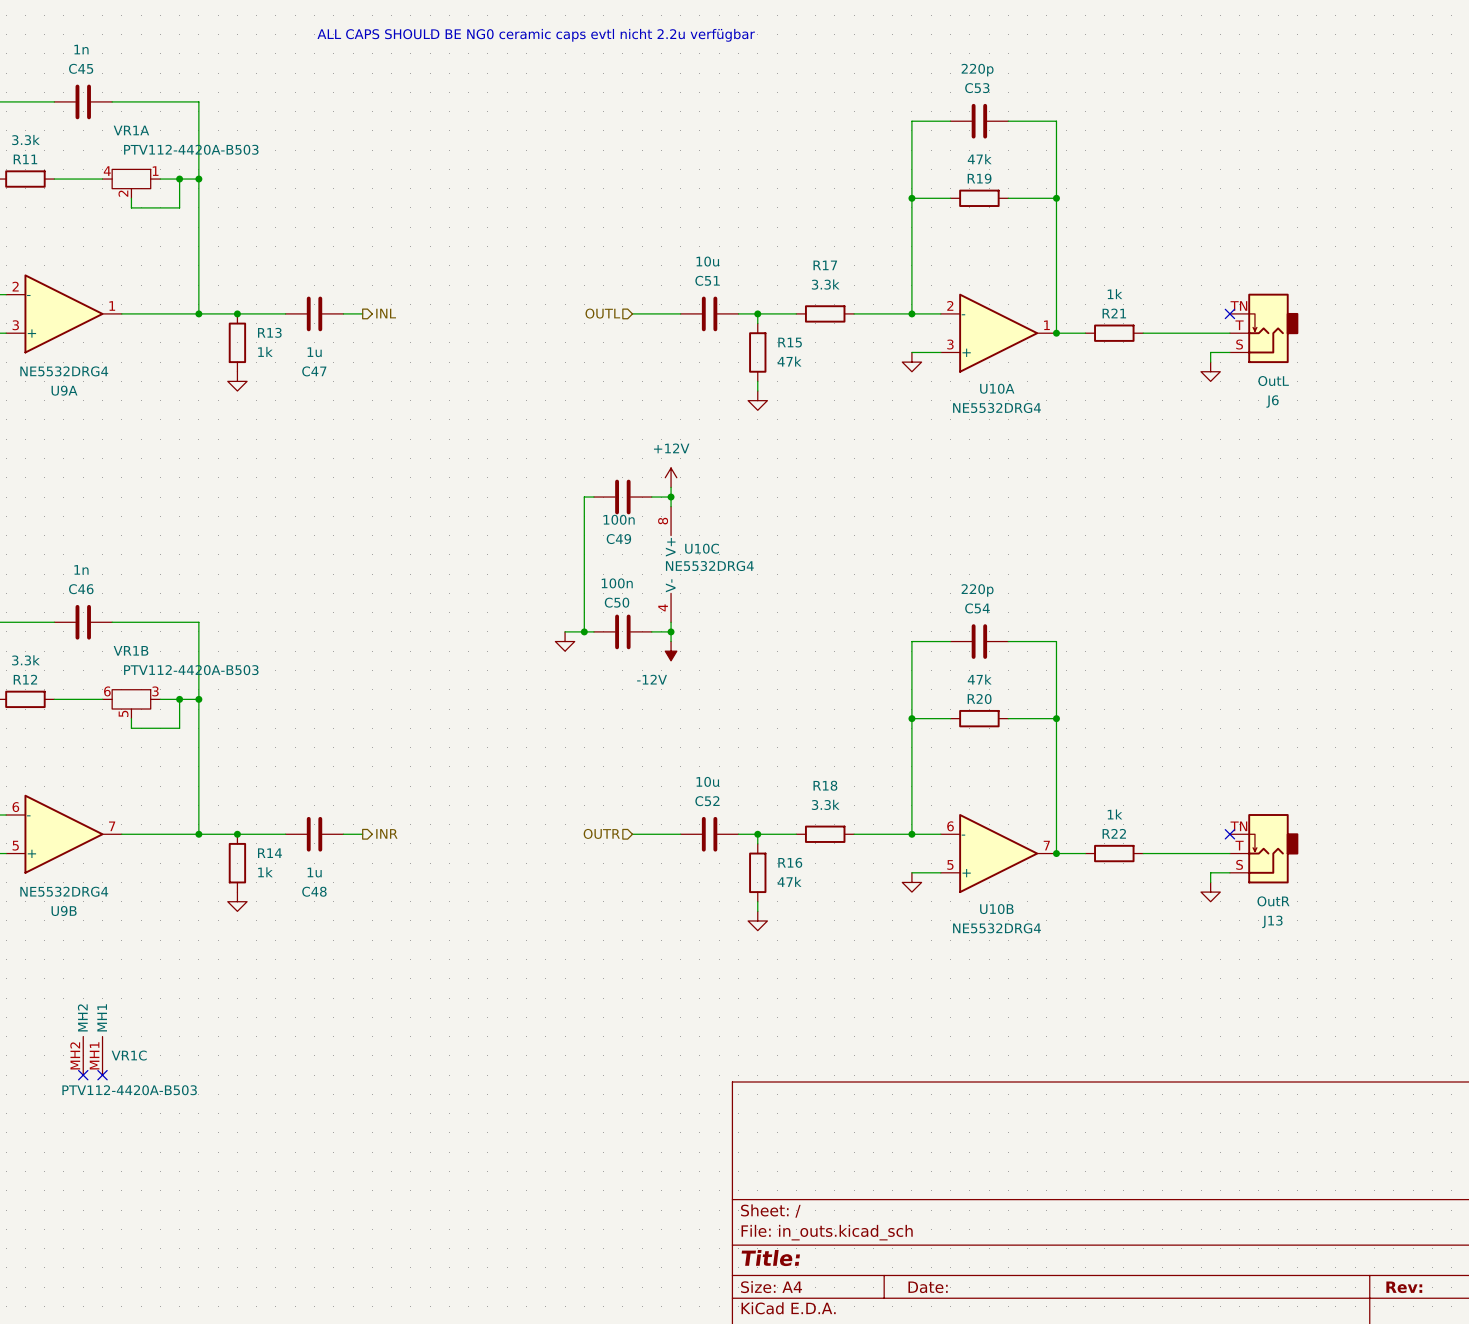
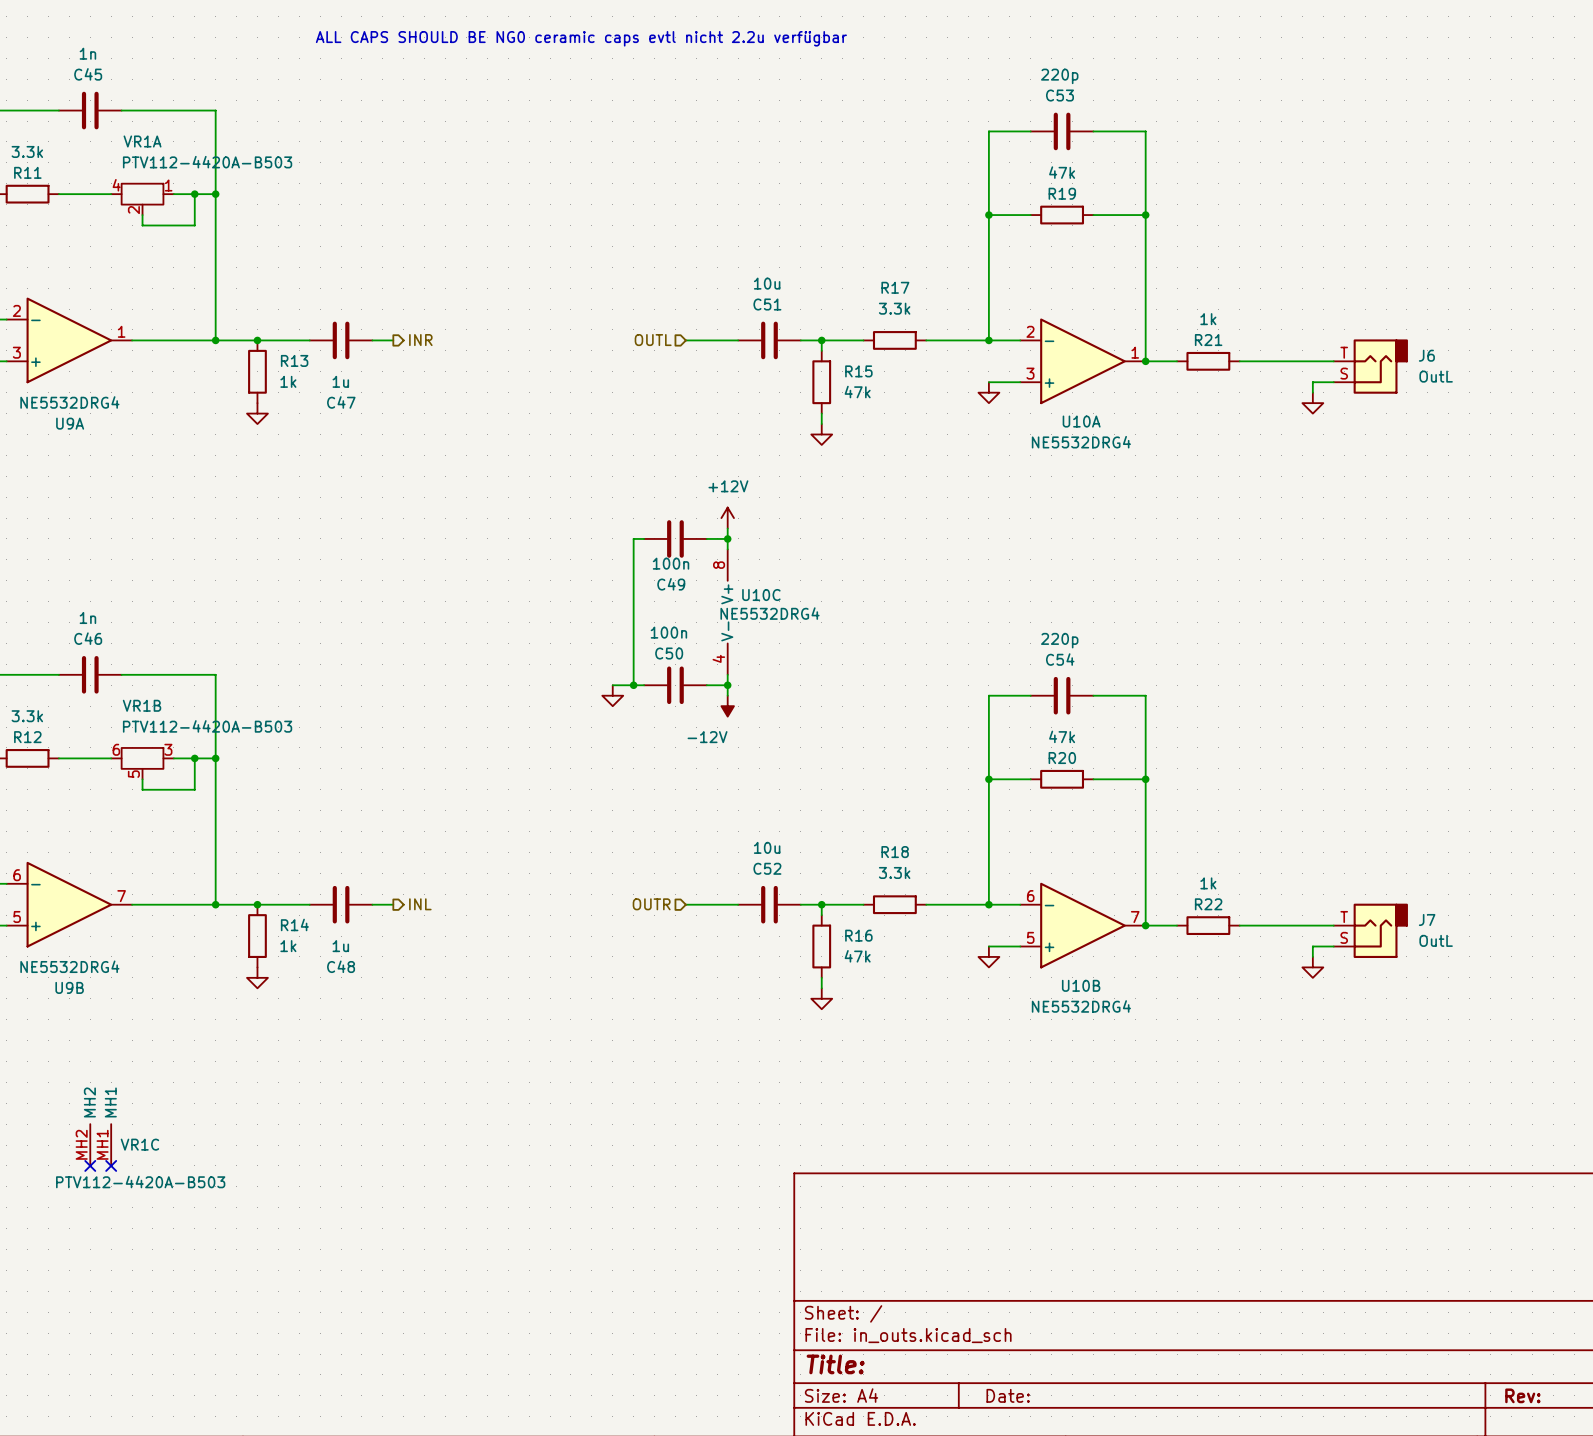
J6 symbol: [1229, 293, 1299, 364] -> [1333, 339, 1408, 394]
hierarchical label: INL (386, 313) -> INR (420, 340)
no-connect mark: (1229, 313) -> none
J6 value position: OutL (1273, 381) -> OutL (1436, 376)
J6 name position: J6 (1272, 401) -> J6 (1426, 355)
hierarchical label: INR (386, 833) -> INL (420, 904)
no-connect mark: (1229, 834) -> none
J13: OutR (1264, 848) -> none
J7: none -> OutL (1370, 930)

